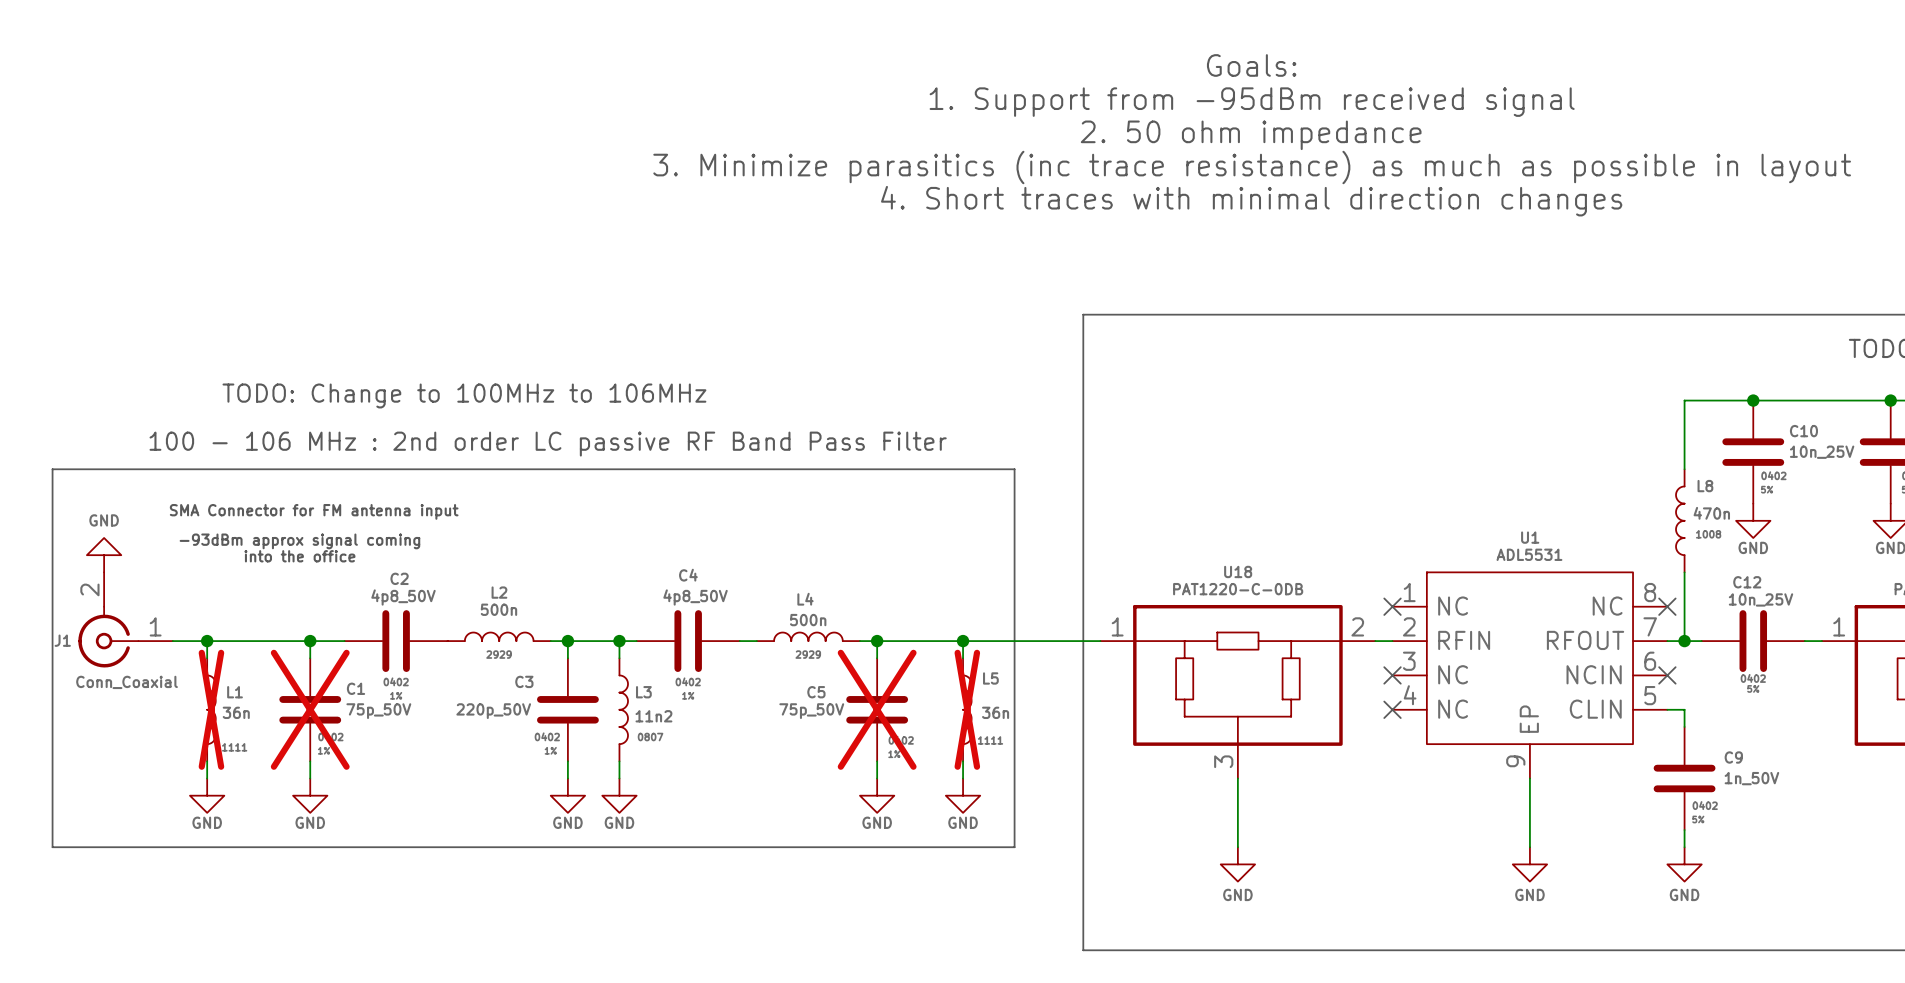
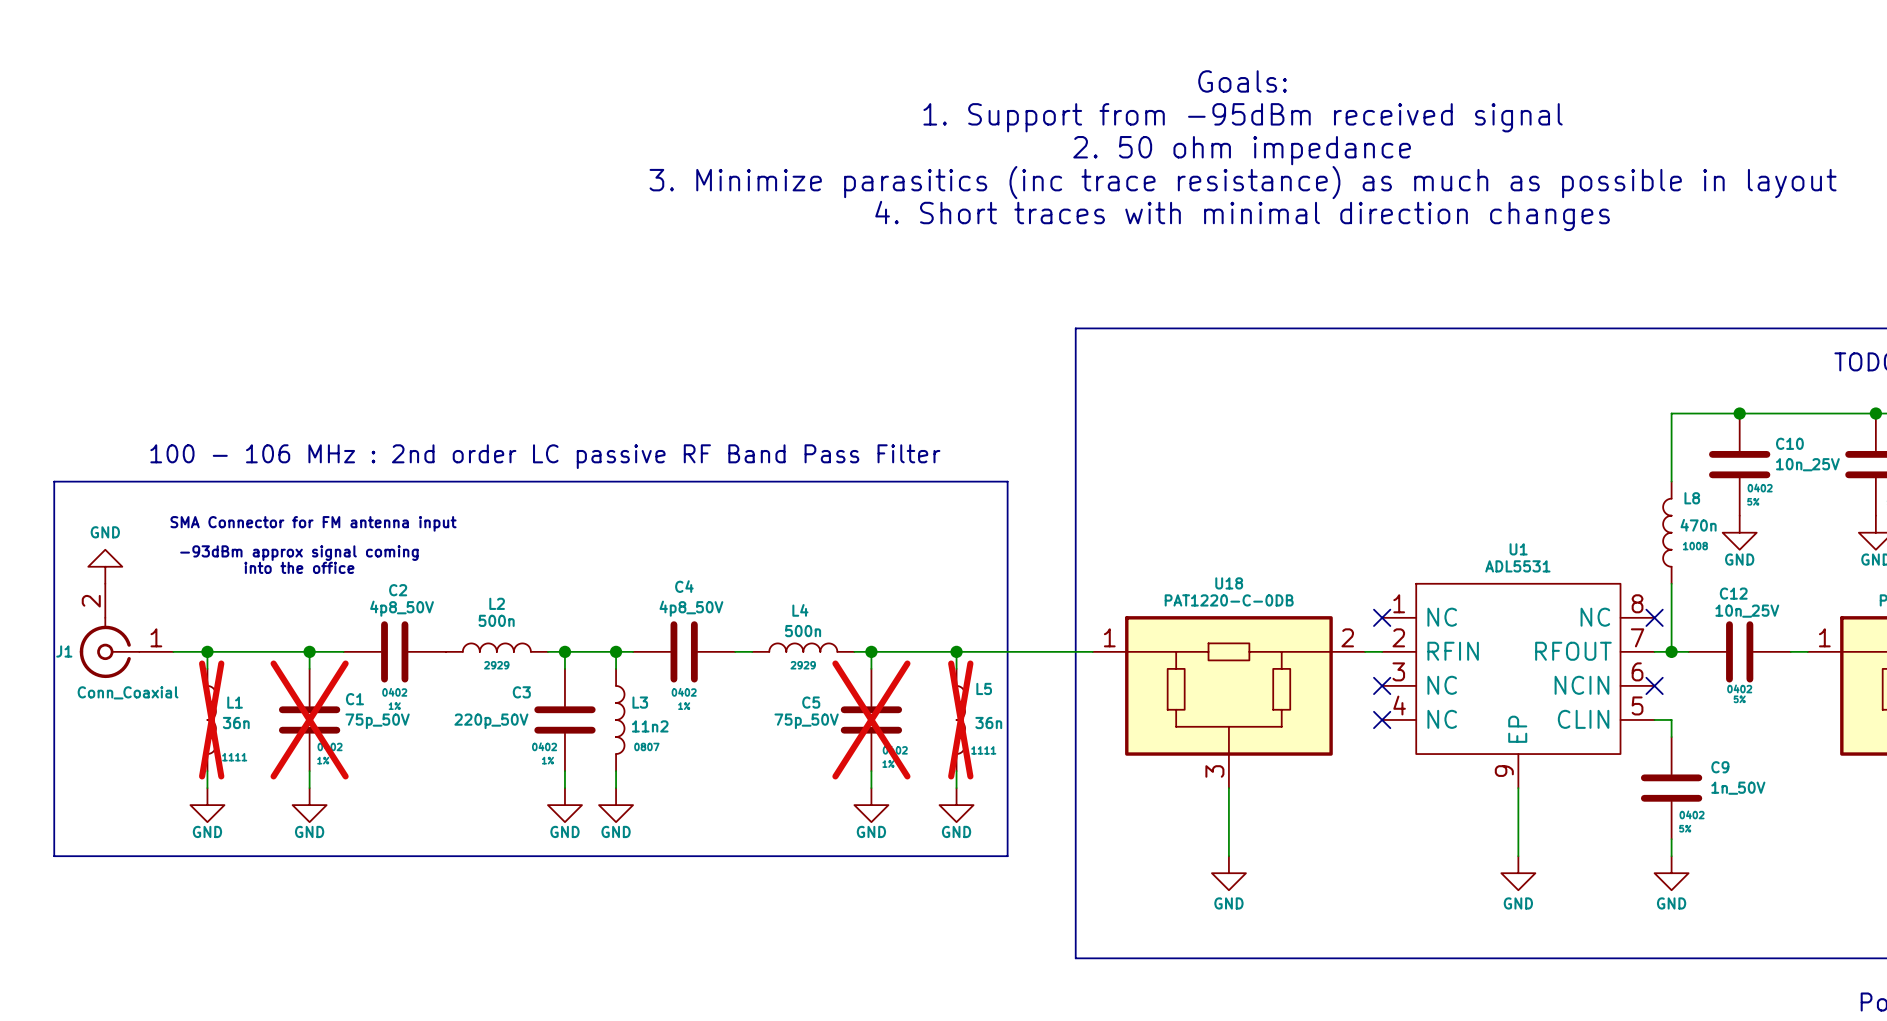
text: TODO: Change to 100MHz to 106MHz (464, 395) -> none

